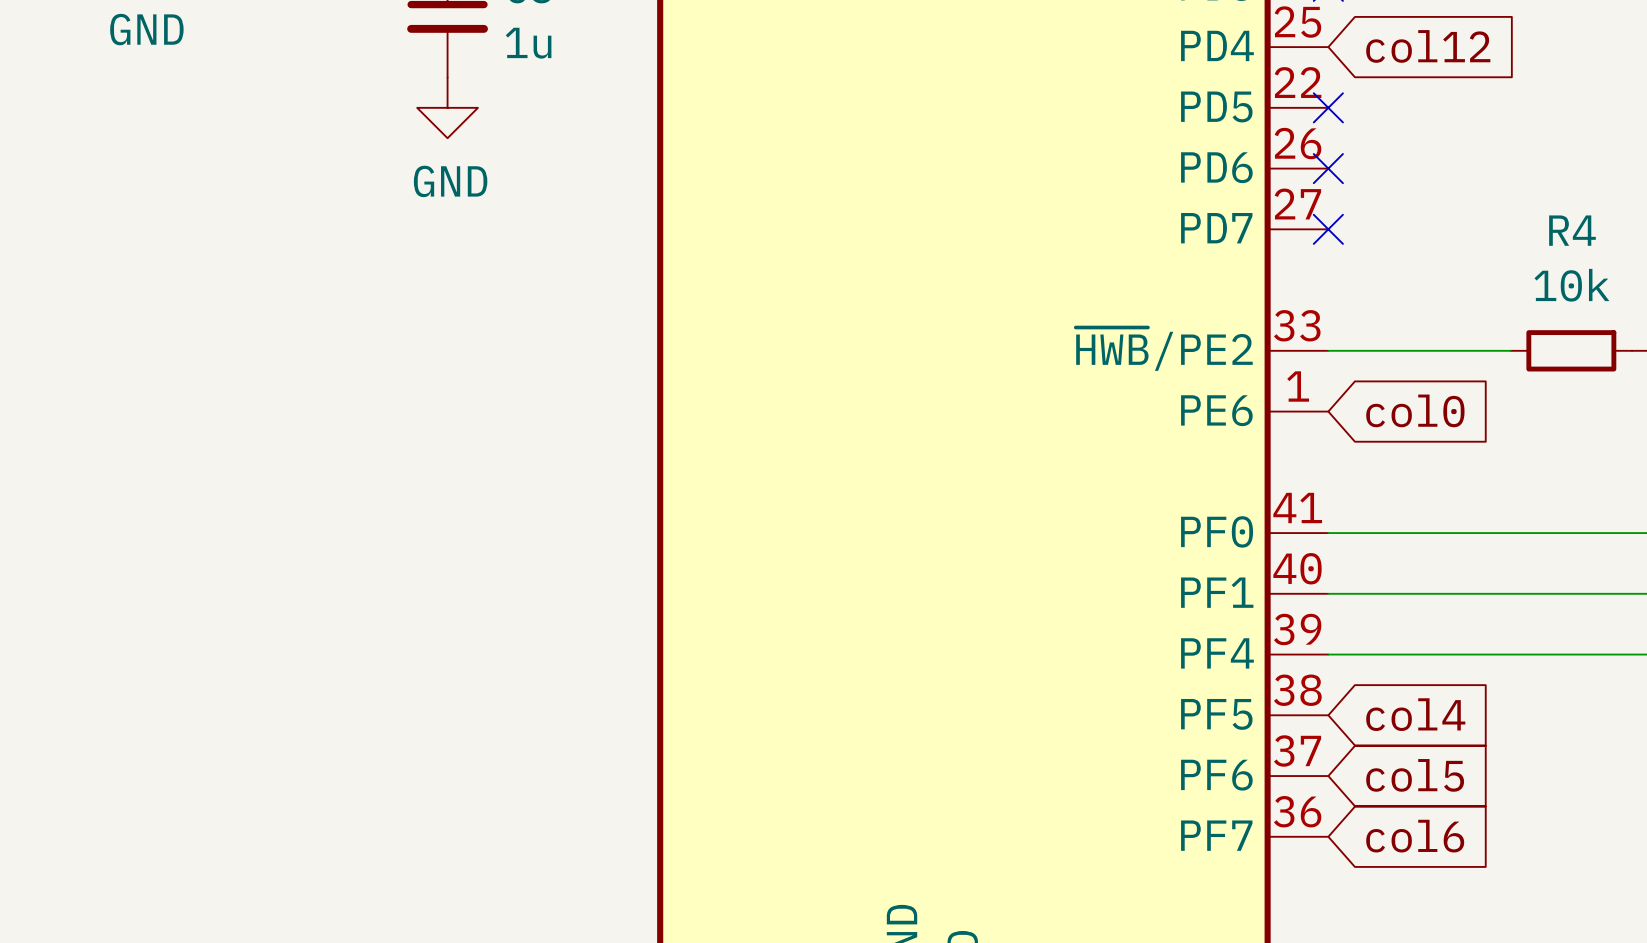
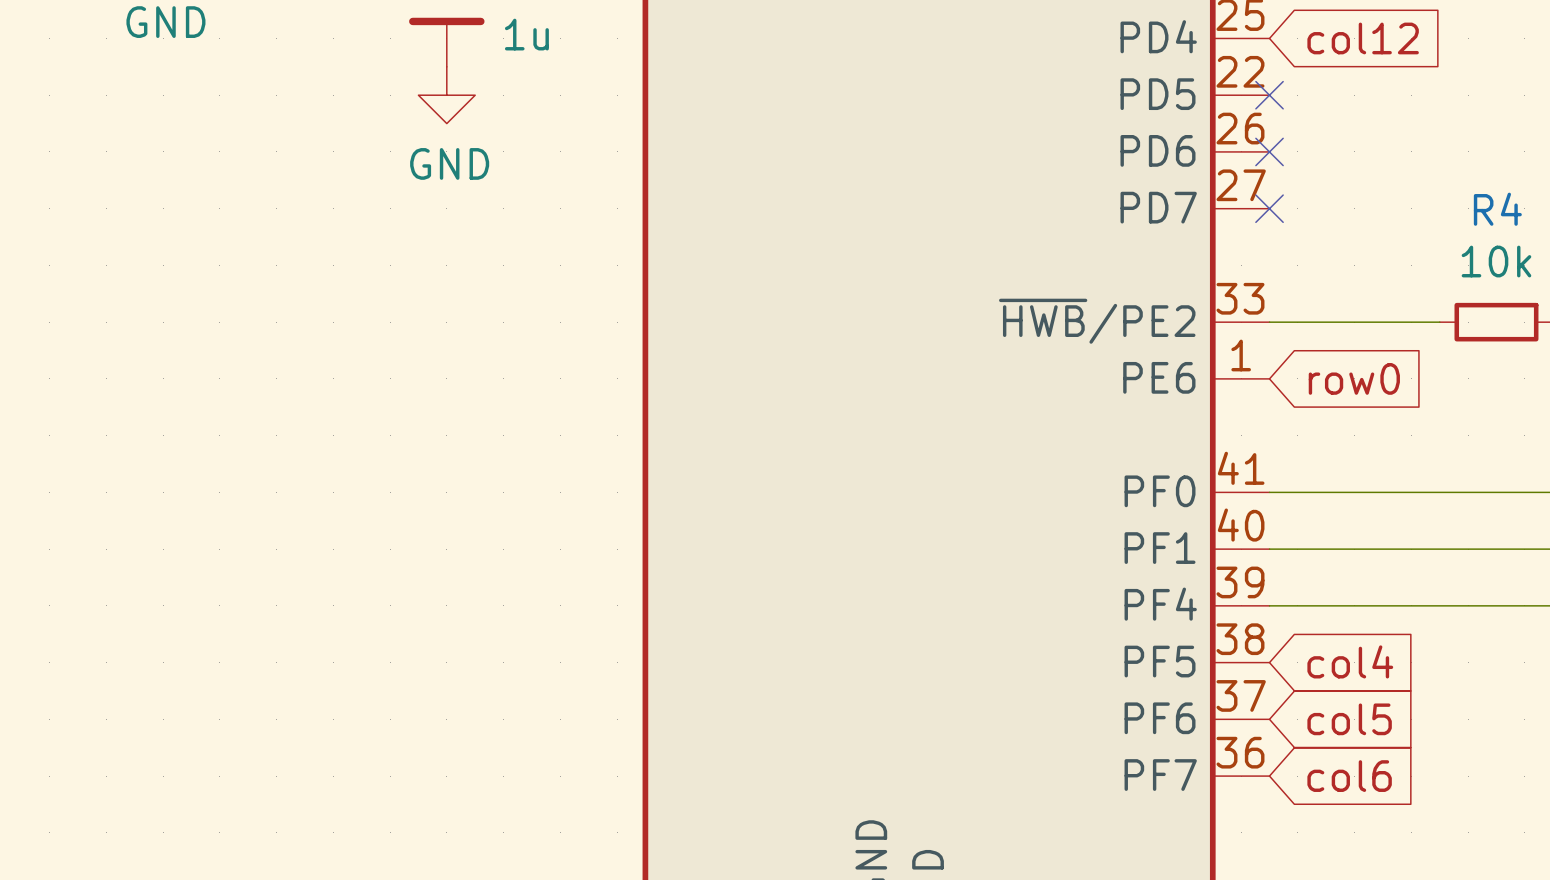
global label: col0 (1415, 410) -> row0 (1354, 378)

